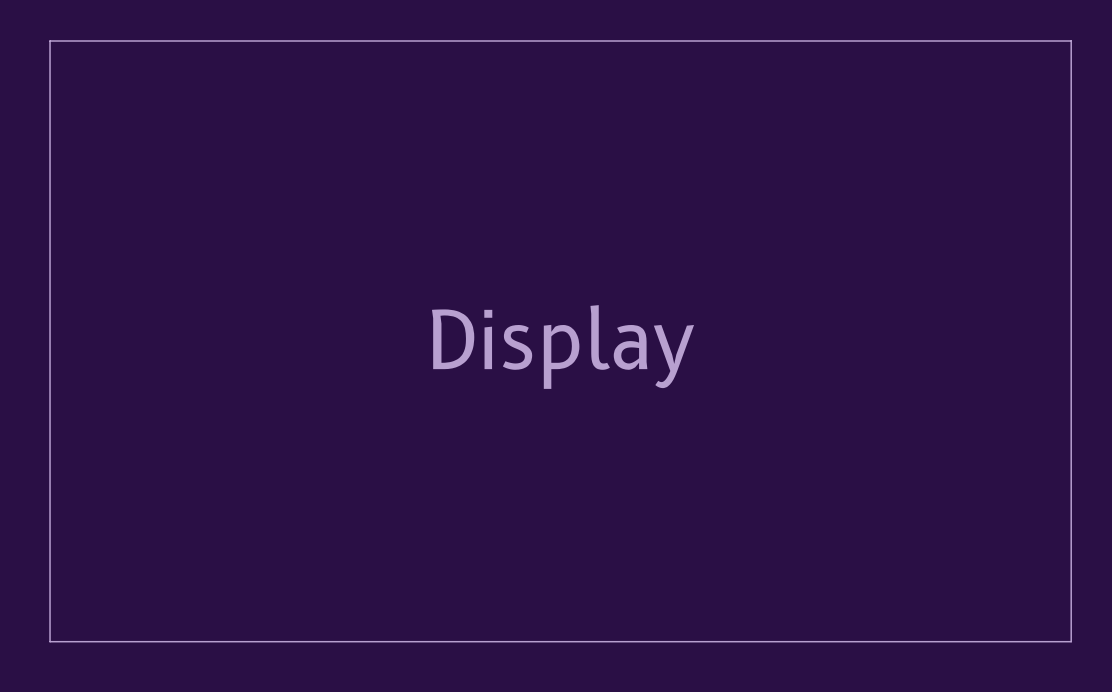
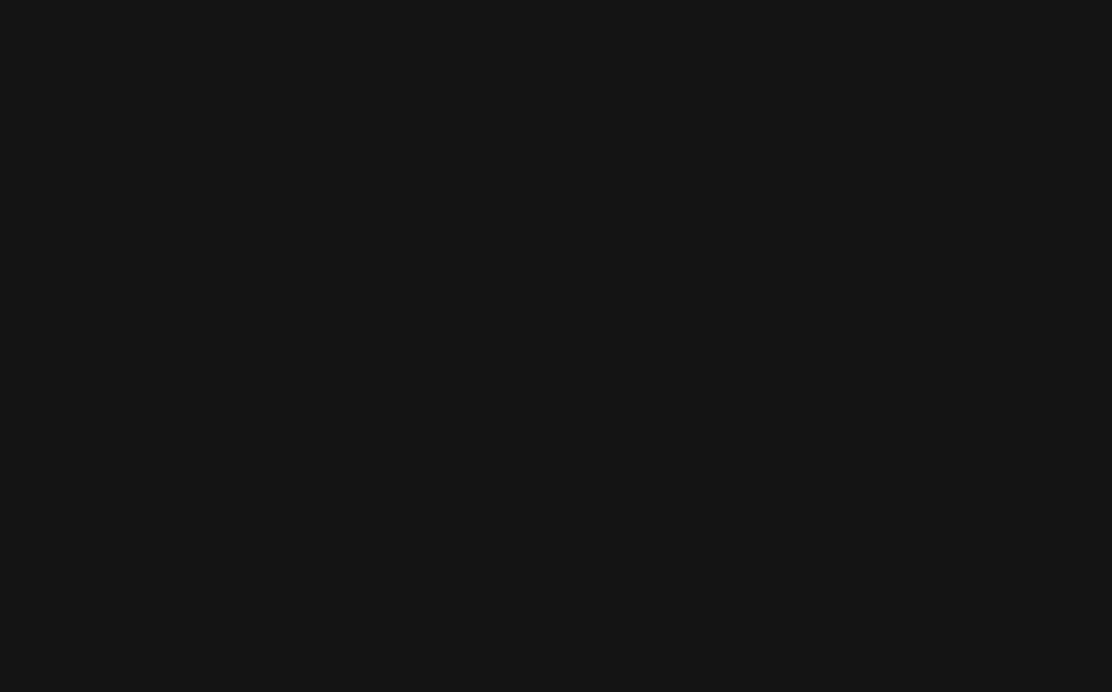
line: (50, 41) (50, 641) (1071, 641) (1071, 41) (50, 41) -> none
text: Display (563, 347) -> none

